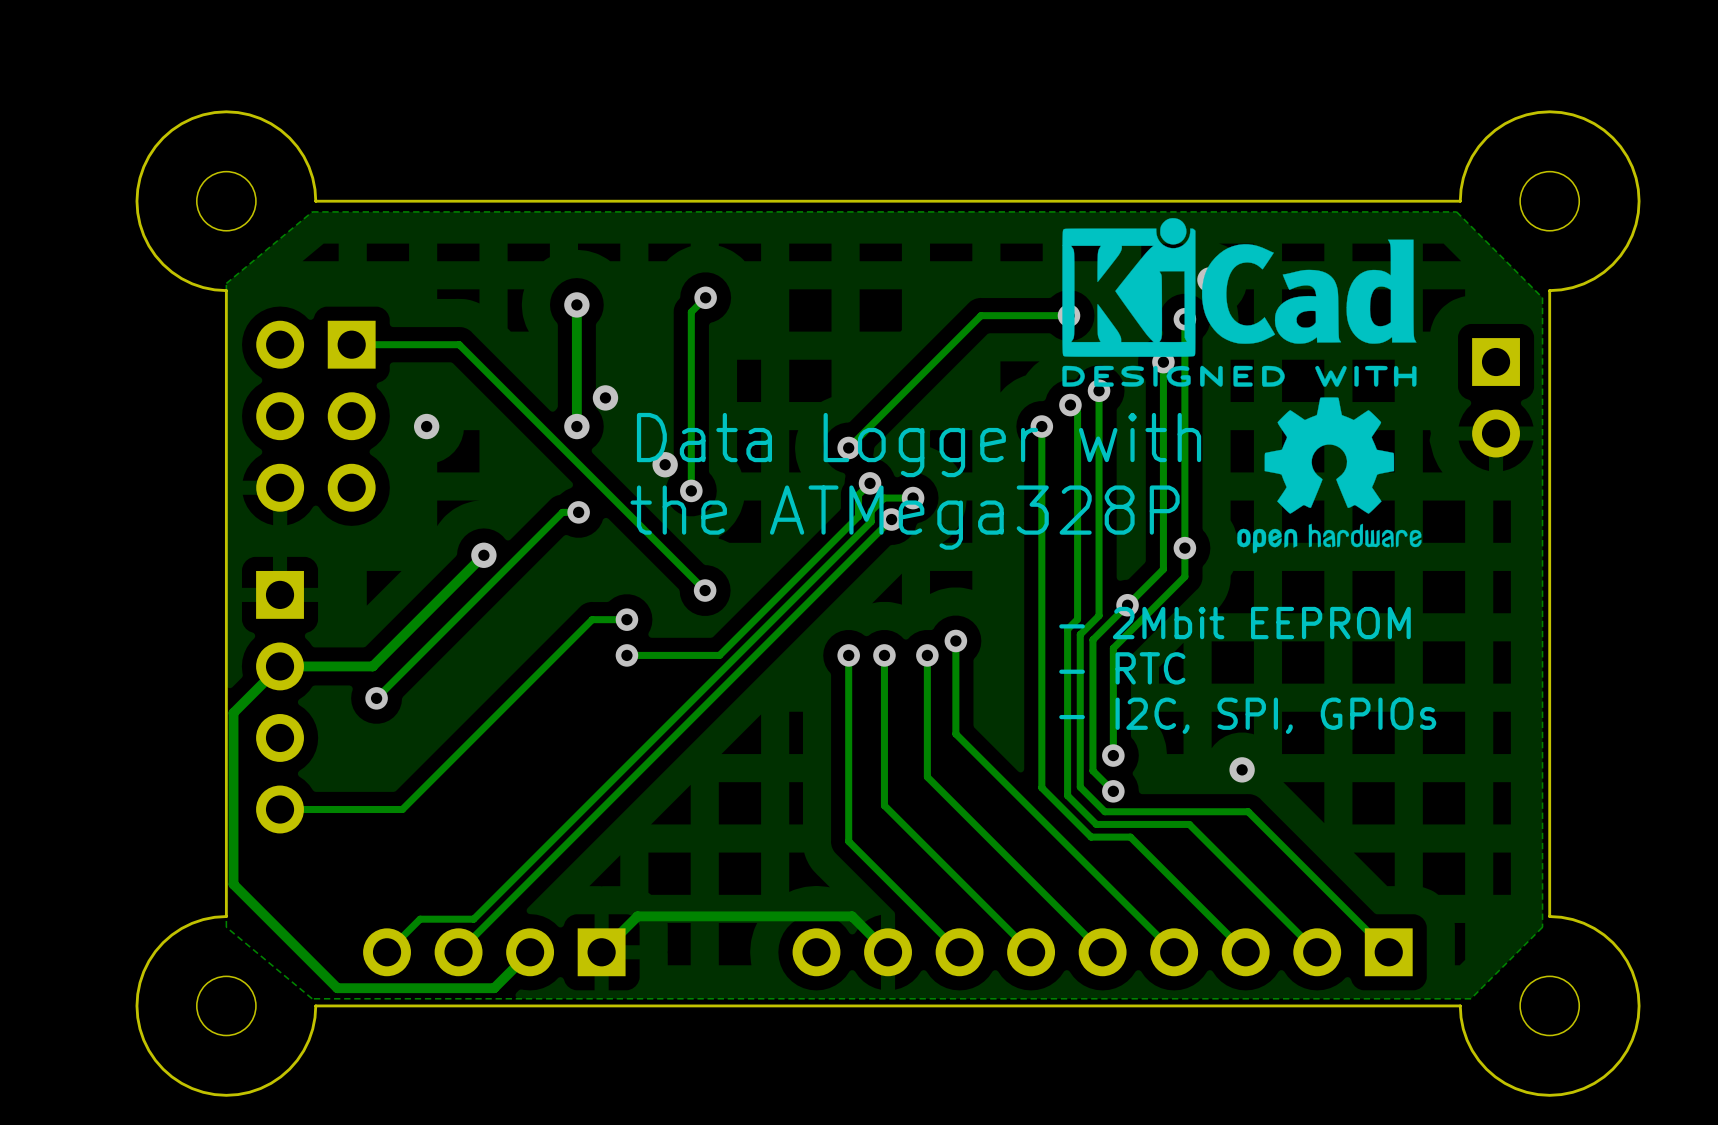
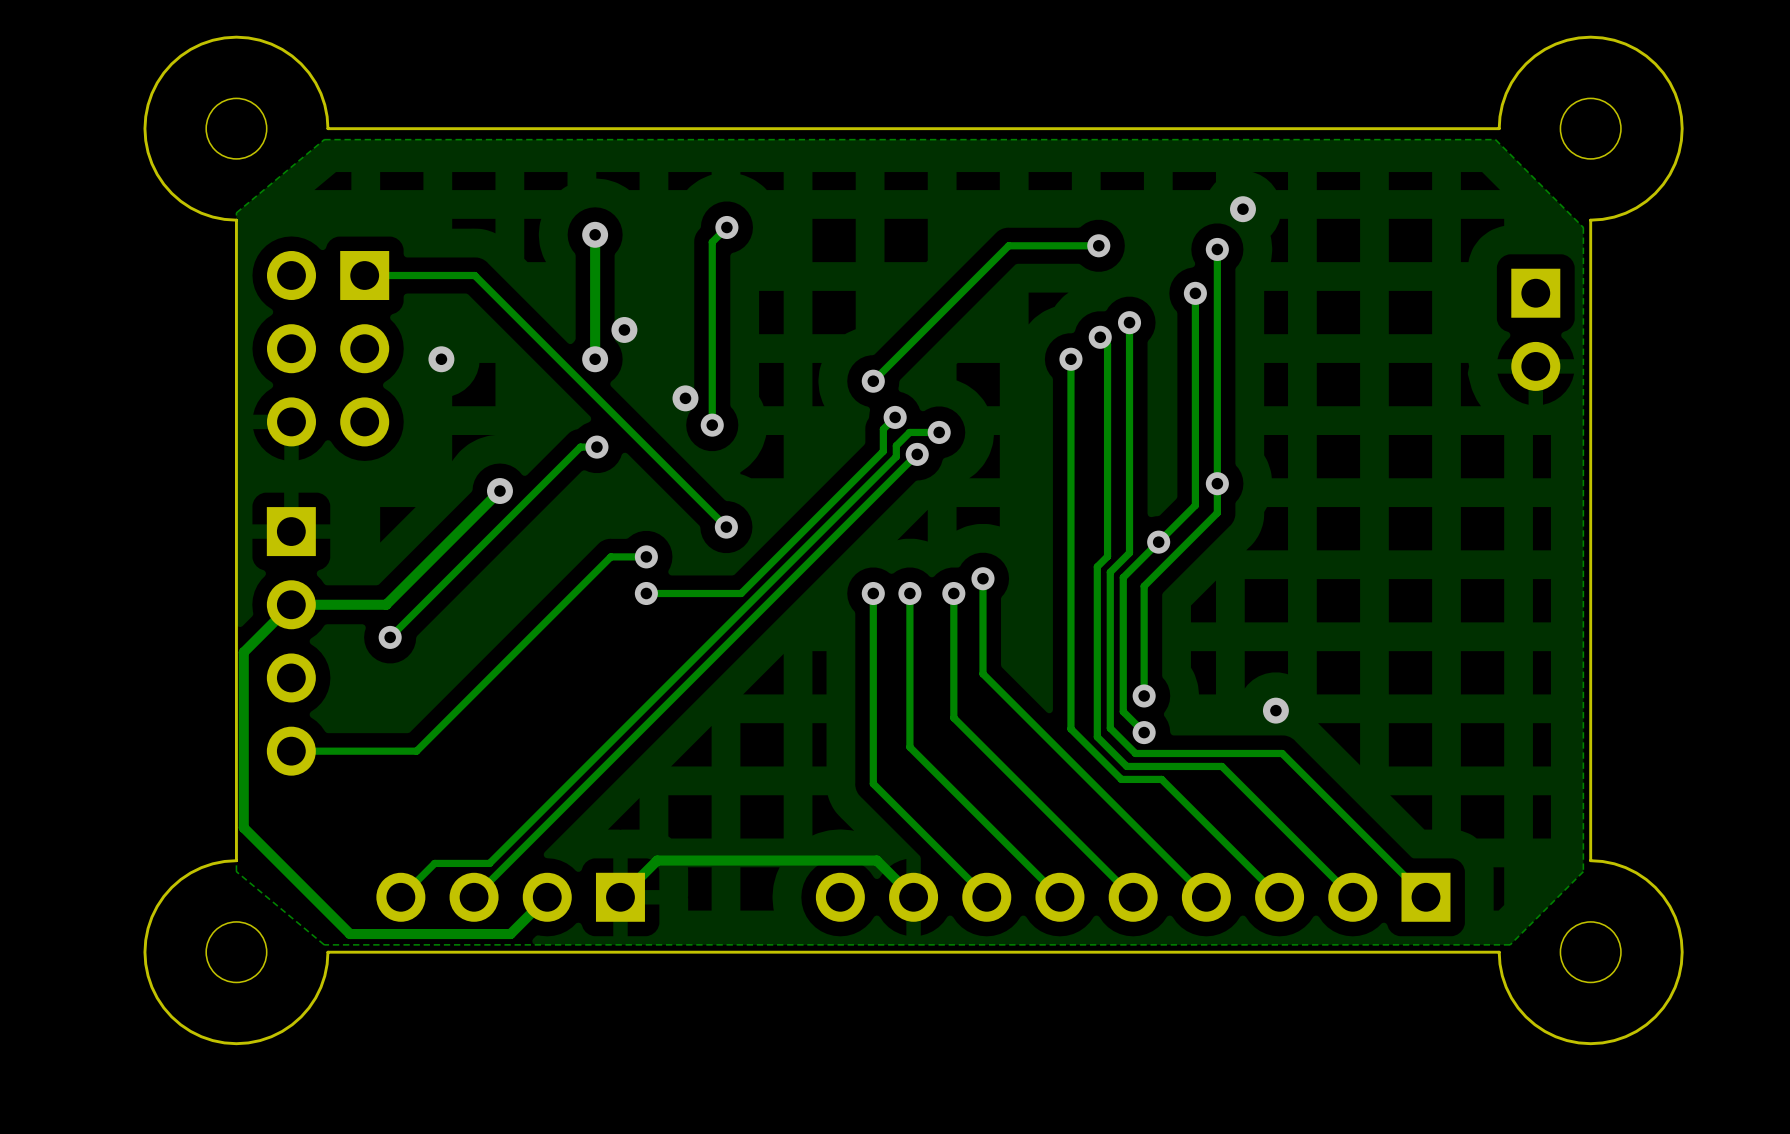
drawing: [1062, 218, 1422, 554] -> none
text: Data Logger with (919, 445) -> none
text: the ATMega328P (905, 517) -> none
text: - 2Mbit EEPROM (1234, 623) -> none
text: - RTC (1122, 668) -> none
text: - I2C, SPI, GPIOs (1247, 715) -> none

